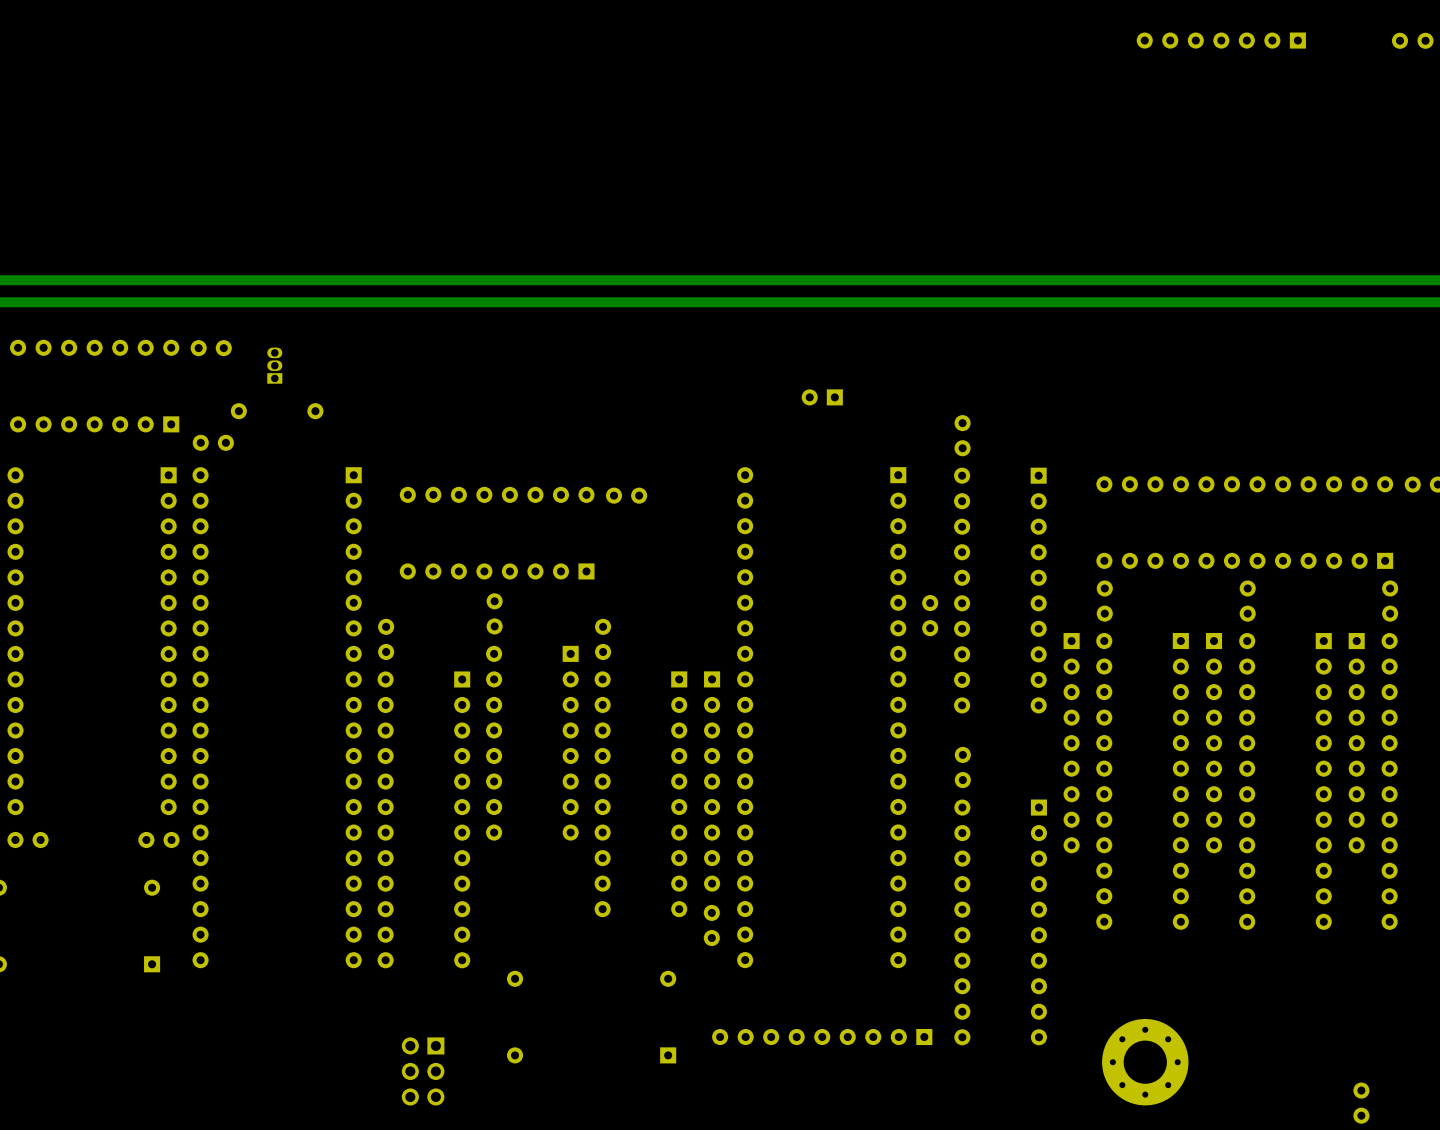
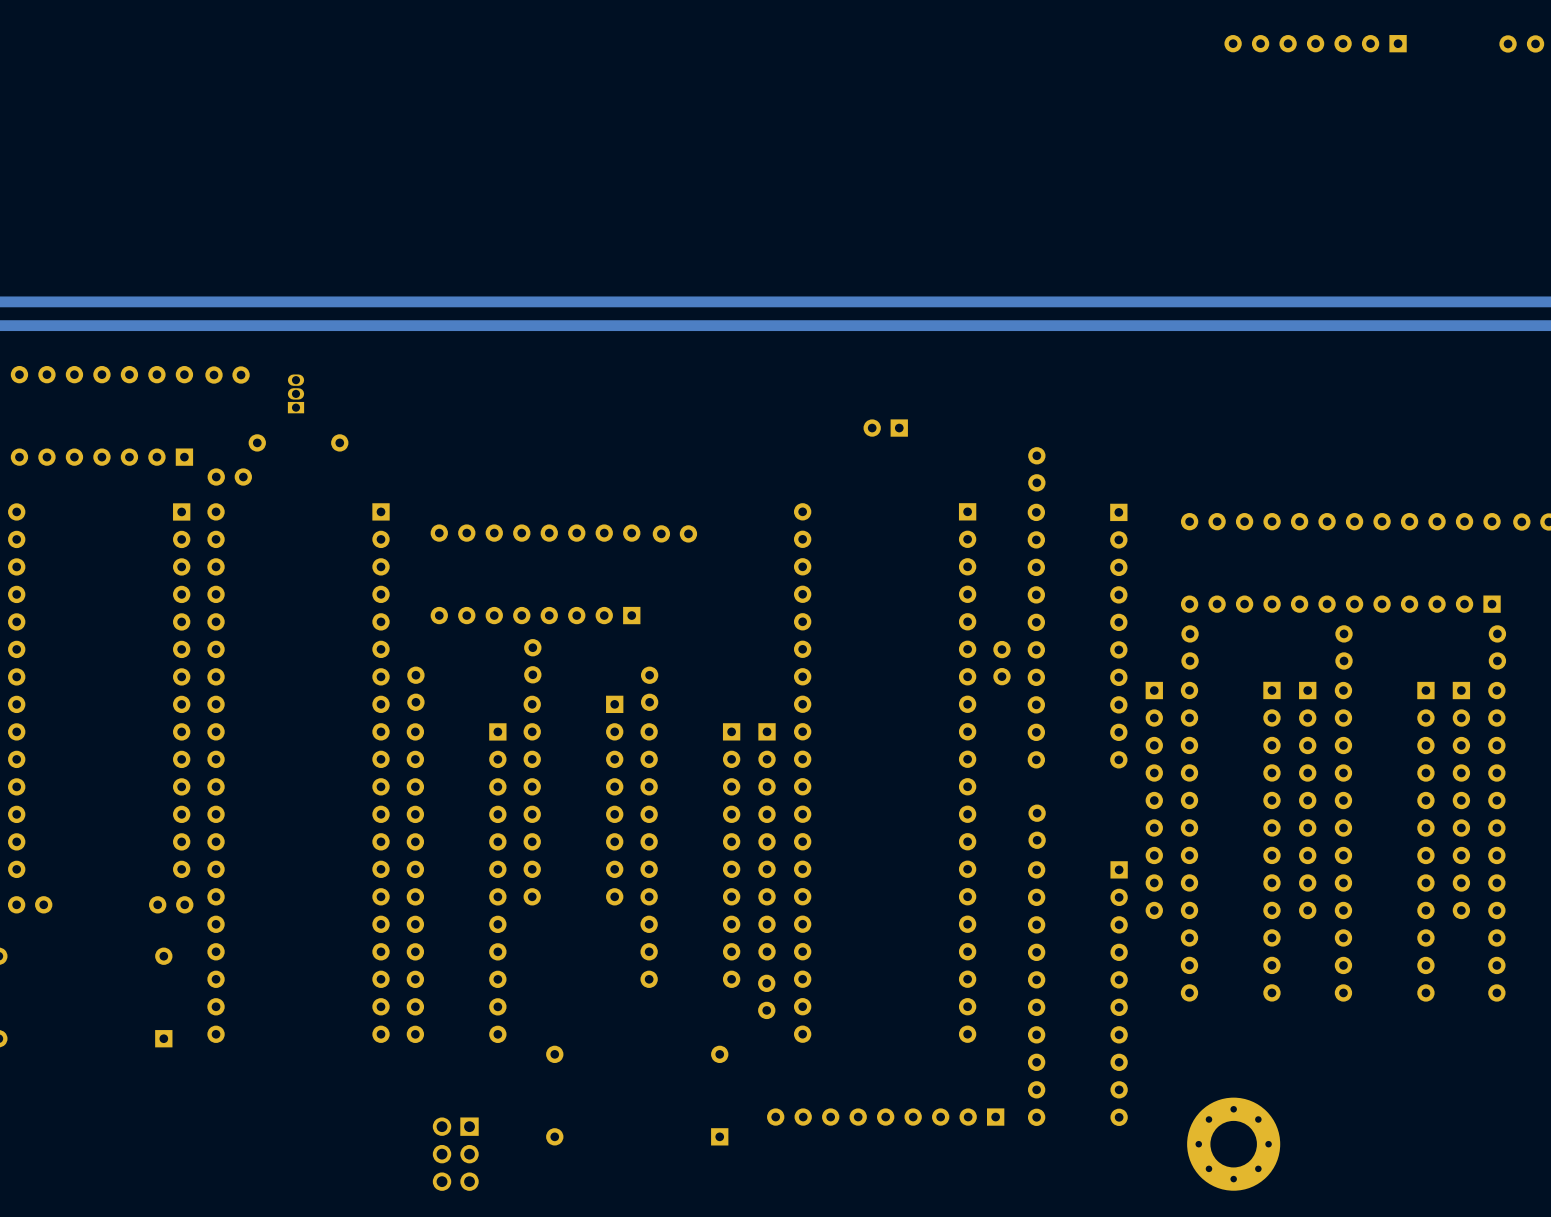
part: (1361, 1103) -> none

